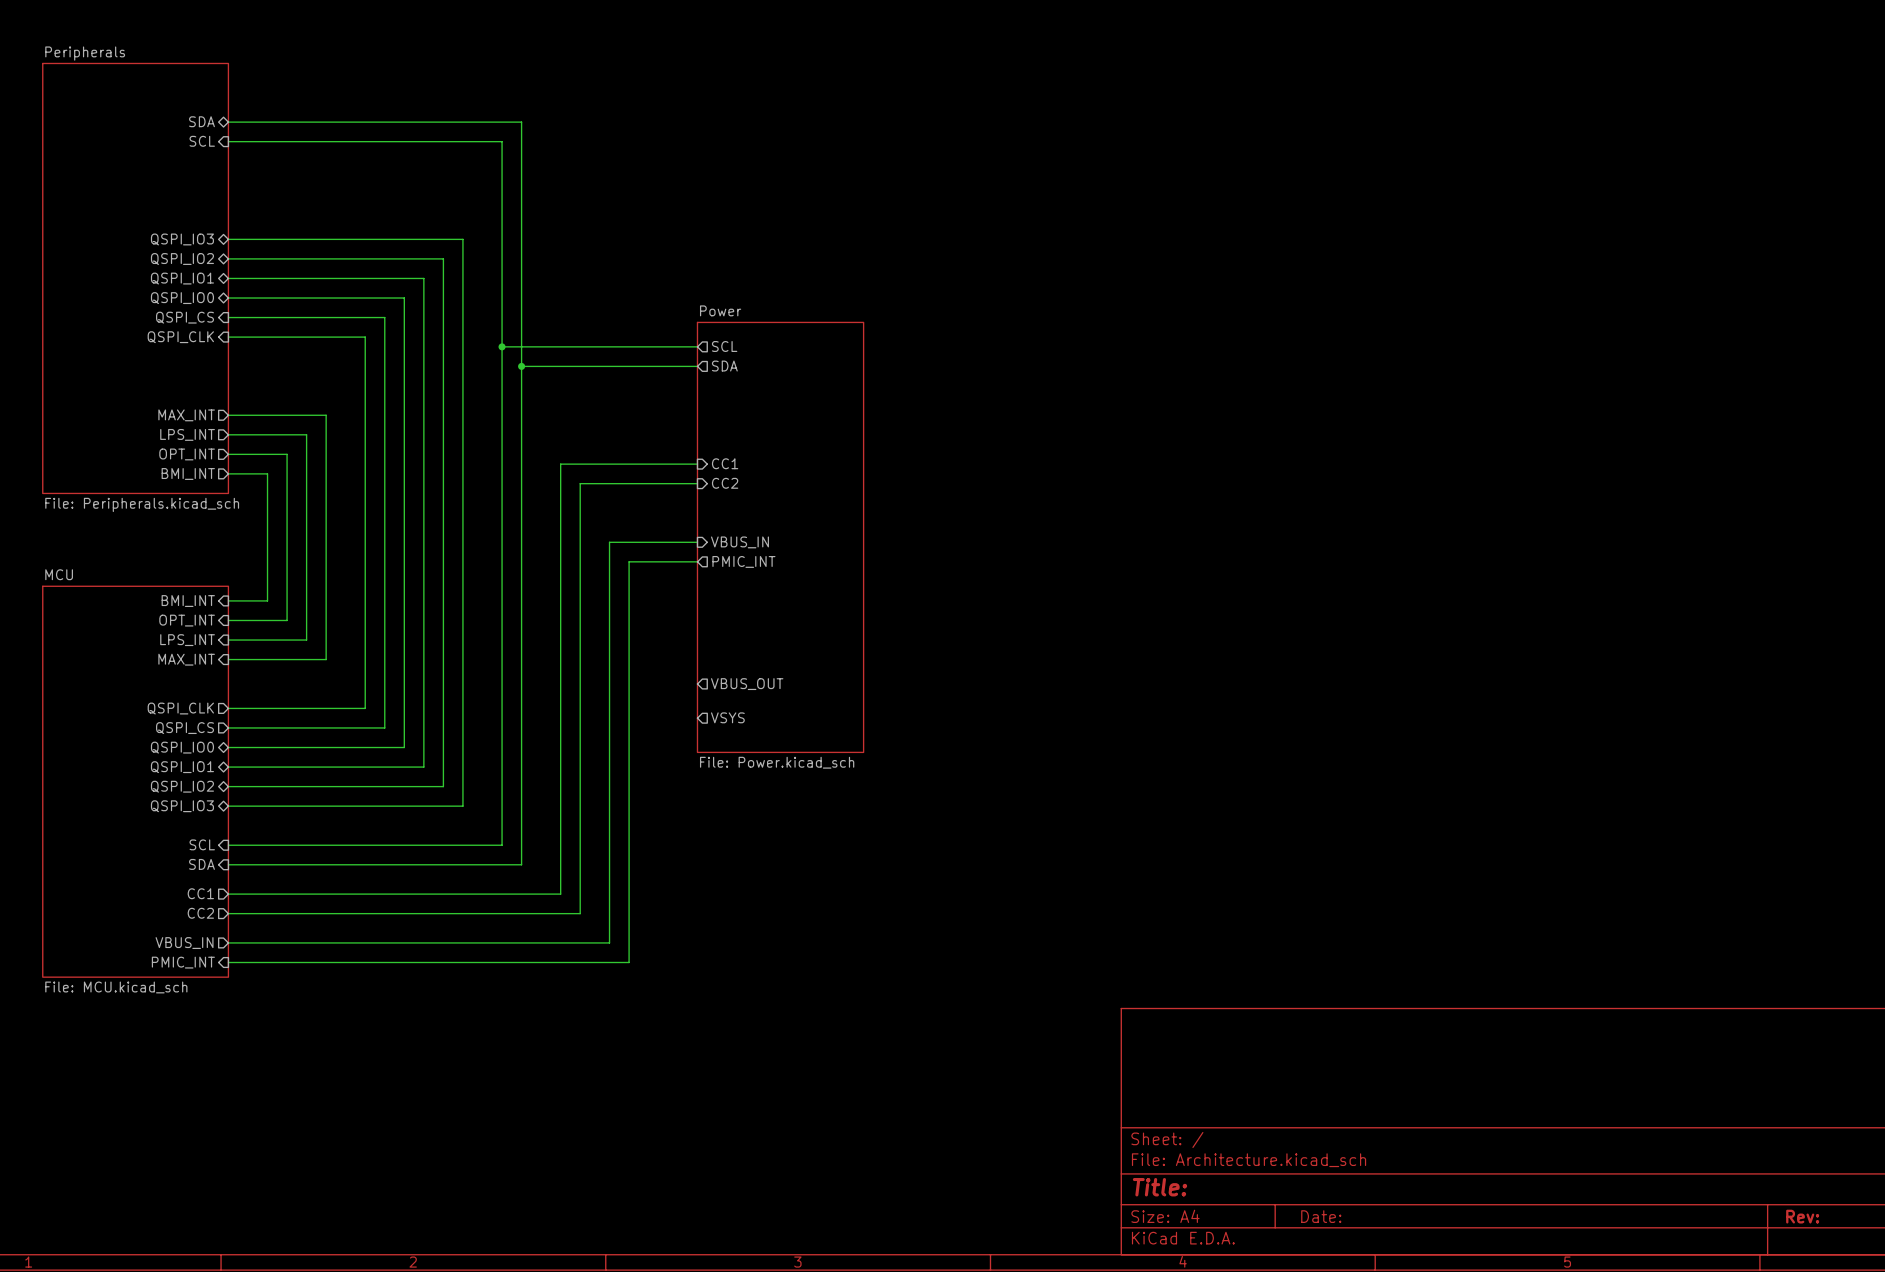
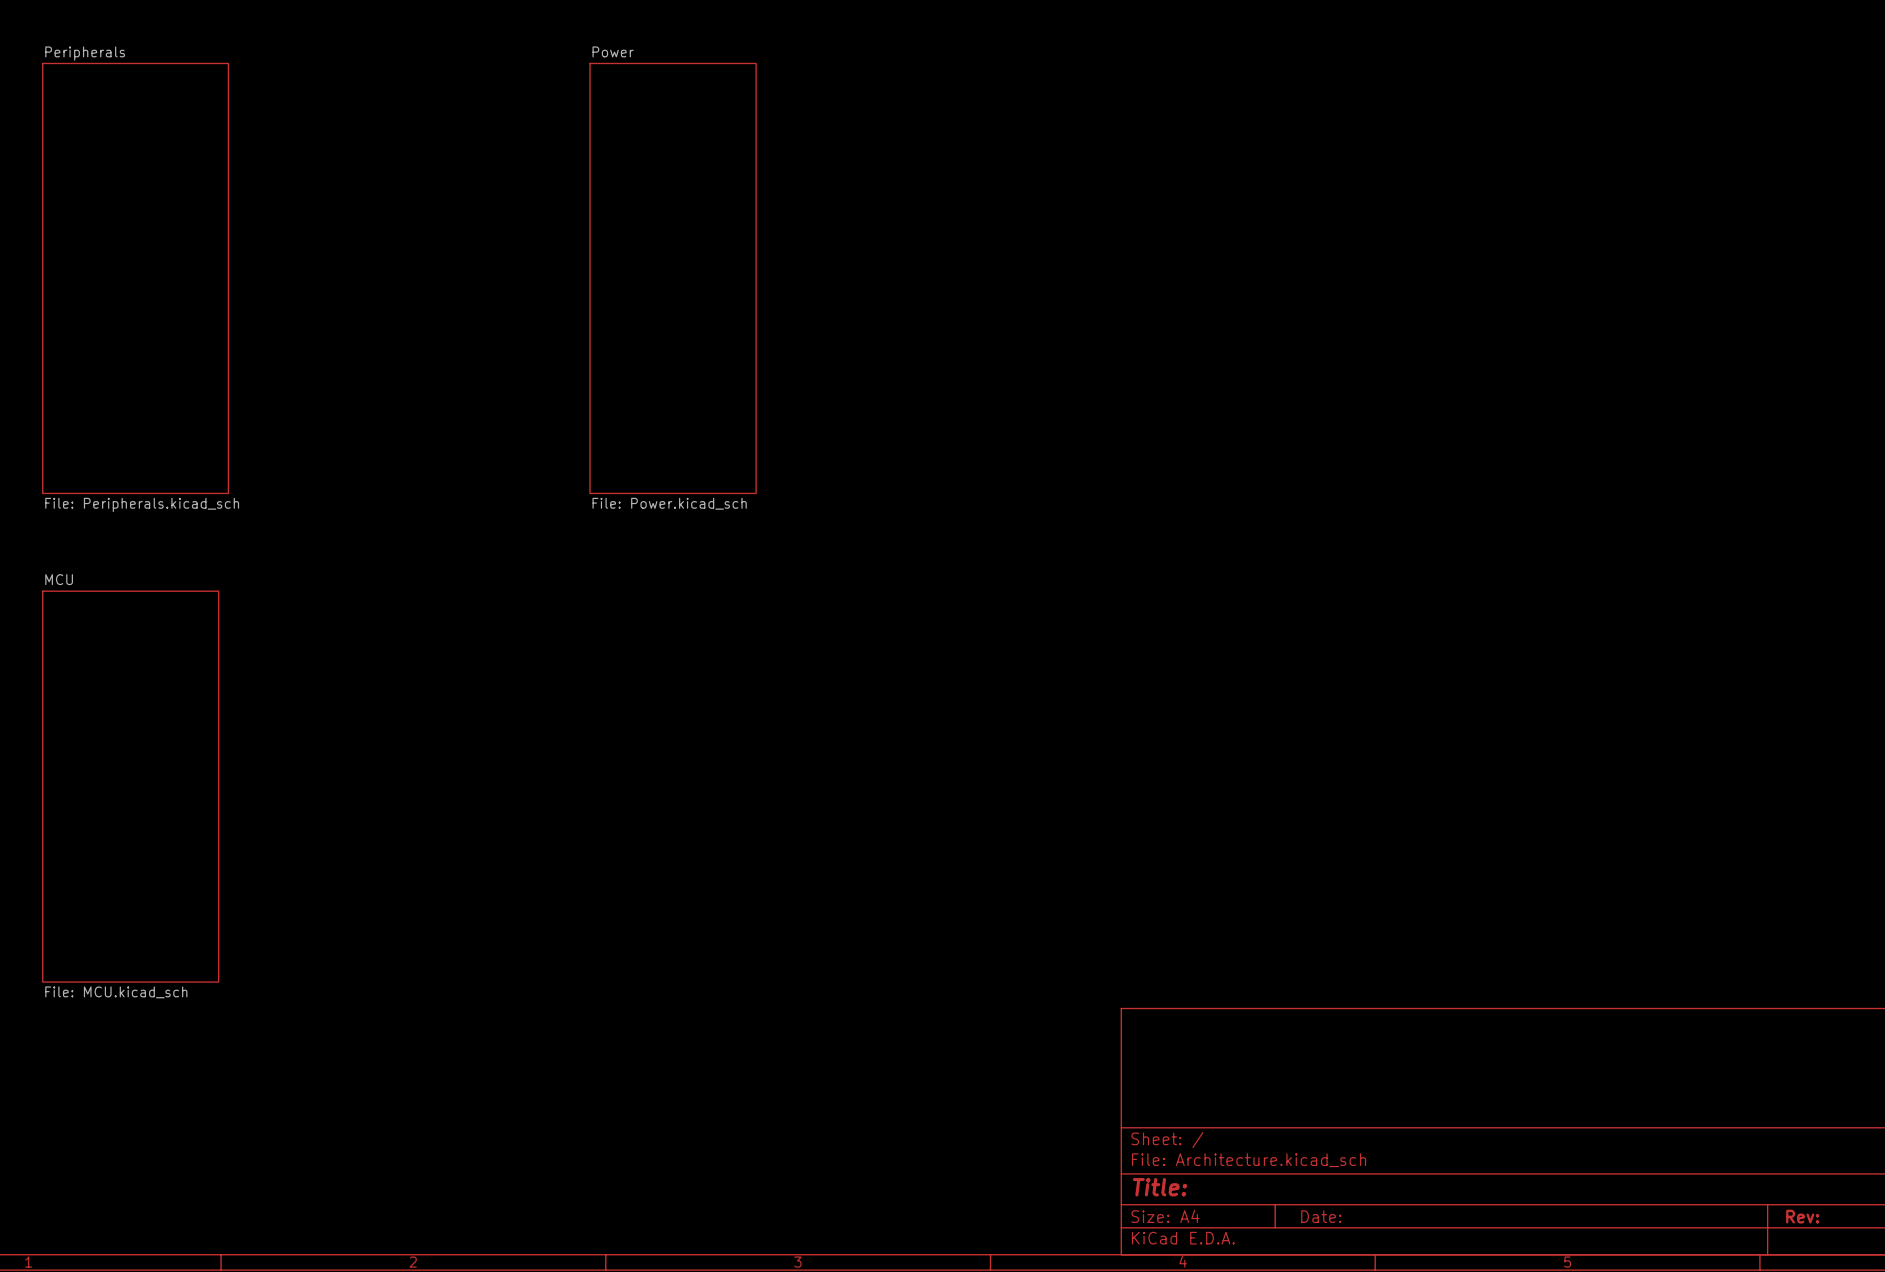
sheet pin: SDA (201, 121) -> none
wire: (228, 122) (521, 122) (521, 864) (228, 864) -> none
sheet pin: SCL (202, 141) -> none
wire: (228, 141) (502, 141) (502, 845) (228, 845) -> none
sheet pin: QSPI_IO3 (182, 239) -> none
wire: (228, 239) (462, 239) (462, 806) (228, 806) -> none
wire: (228, 258) (443, 258) (443, 786) (228, 786) -> none
sheet pin: QSPI_IO2 (182, 259) -> none
sheet pin: QSPI_IO1 (182, 278) -> none
wire: (228, 278) (423, 278) (423, 767) (228, 767) -> none
sheet Power: none -> File: Power.kicad_sch (673, 278)
sheet pin: QSPI_IO0 (182, 298) -> none
wire: (228, 298) (404, 298) (404, 747) (228, 747) -> none
sheet pin: QSPI_CS (184, 317) -> none
wire: (228, 317) (384, 317) (384, 727) (228, 727) -> none
sheet pin: QSPI_CLK (180, 337) -> none
wire: (228, 337) (365, 337) (365, 708) (228, 708) -> none
wire: (502, 346) (697, 346) -> none
junction: (502, 346) -> none
sheet pin: SCL (724, 346) -> none
wire: (521, 366) (697, 366) -> none
junction: (521, 366) -> none
sheet pin: SDA (724, 366) -> none
sheet pin: MAX_INT (186, 415) -> none
wire: (228, 415) (326, 415) (326, 659) (228, 659) -> none
sheet pin: LPS_INT (187, 434) -> none
wire: (228, 434) (306, 434) (306, 640) (228, 640) -> none
sheet pin: OPT_INT (187, 454) -> none
wire: (228, 454) (287, 454) (287, 620) (228, 620) -> none
sheet pin: CC1 (725, 463) -> none
wire: (697, 464) (560, 464) (560, 894) (228, 894) -> none
wire: (228, 473) (267, 473) (267, 600) (228, 600) -> none
sheet pin: BMI_INT (188, 474) -> none
wire: (697, 483) (580, 483) (580, 913) (228, 913) -> none
sheet pin: CC2 (725, 483) -> none
sheet Power: File: Power.kicad_sch (780, 537) -> none
wire: (697, 542) (609, 542) (609, 942) (228, 942) -> none
sheet pin: VBUS_IN (739, 542) -> none
wire: (697, 561) (629, 561) (629, 962) (228, 962) -> none
sheet pin: PMIC_INT (743, 561) -> none
sheet MCU shape: [42, 585, 230, 978] -> [42, 590, 220, 983]
sheet pin: BMI_INT (188, 601) -> none
sheet pin: OPT_INT (187, 620) -> none
sheet pin: LPS_INT (187, 640) -> none
sheet pin: MAX_INT (186, 659) -> none
sheet pin: VBUS_OUT (747, 684) -> none
sheet pin: QSPI_CLK (180, 708) -> none
sheet pin: VSYS (727, 717) -> none
sheet pin: QSPI_CS (184, 728) -> none
sheet pin: QSPI_IO0 (182, 747) -> none
sheet pin: QSPI_IO1 (182, 767) -> none
sheet pin: QSPI_IO2 (182, 786) -> none
sheet pin: QSPI_IO3 (182, 806) -> none
sheet pin: SCL (202, 844) -> none
sheet pin: SDA (201, 864) -> none
sheet pin: CC1 (200, 893) -> none
sheet pin: CC2 (200, 913) -> none
sheet pin: VBUS_IN (184, 943) -> none
sheet pin: PMIC_INT (183, 962) -> none

